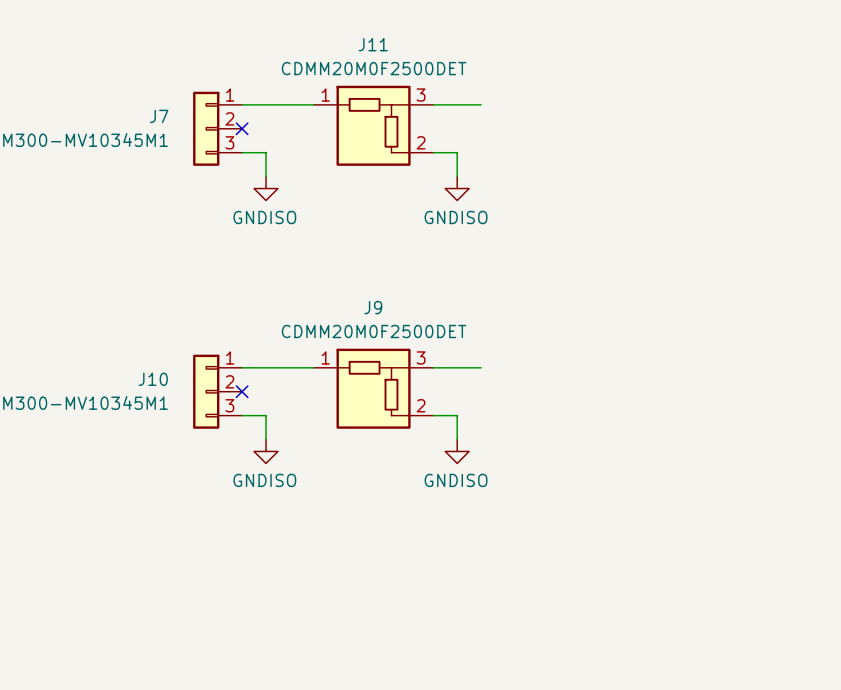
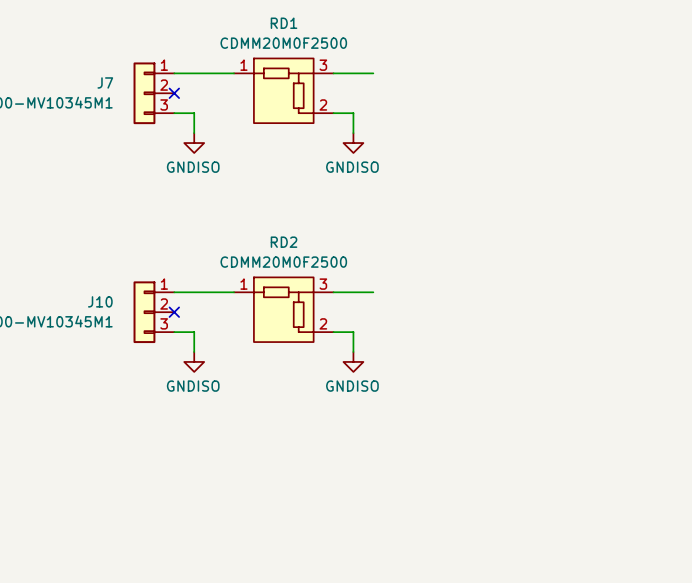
J11: CDMM20M0F2500DET (373, 125) -> none
RD1: none -> CDMM20M0F2500 (283, 90)
J9: CDMM20M0F2500DET (373, 388) -> none
RD2: none -> CDMM20M0F2500 (283, 309)

